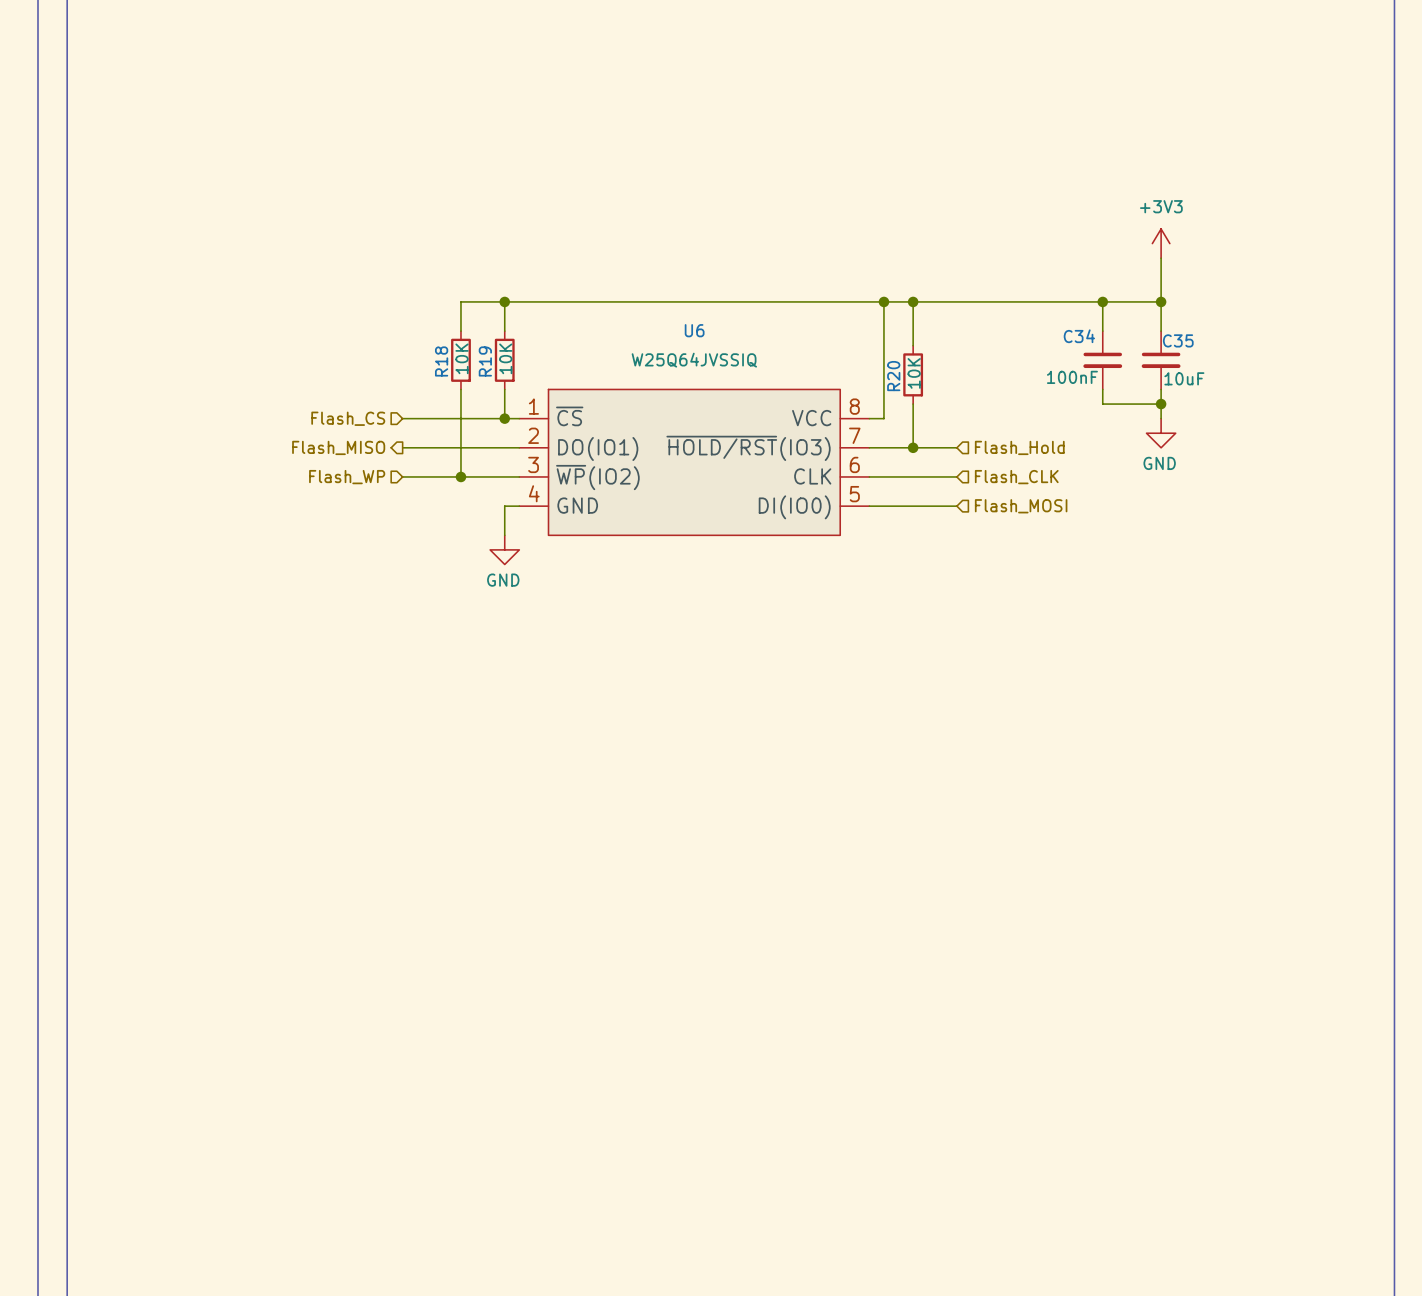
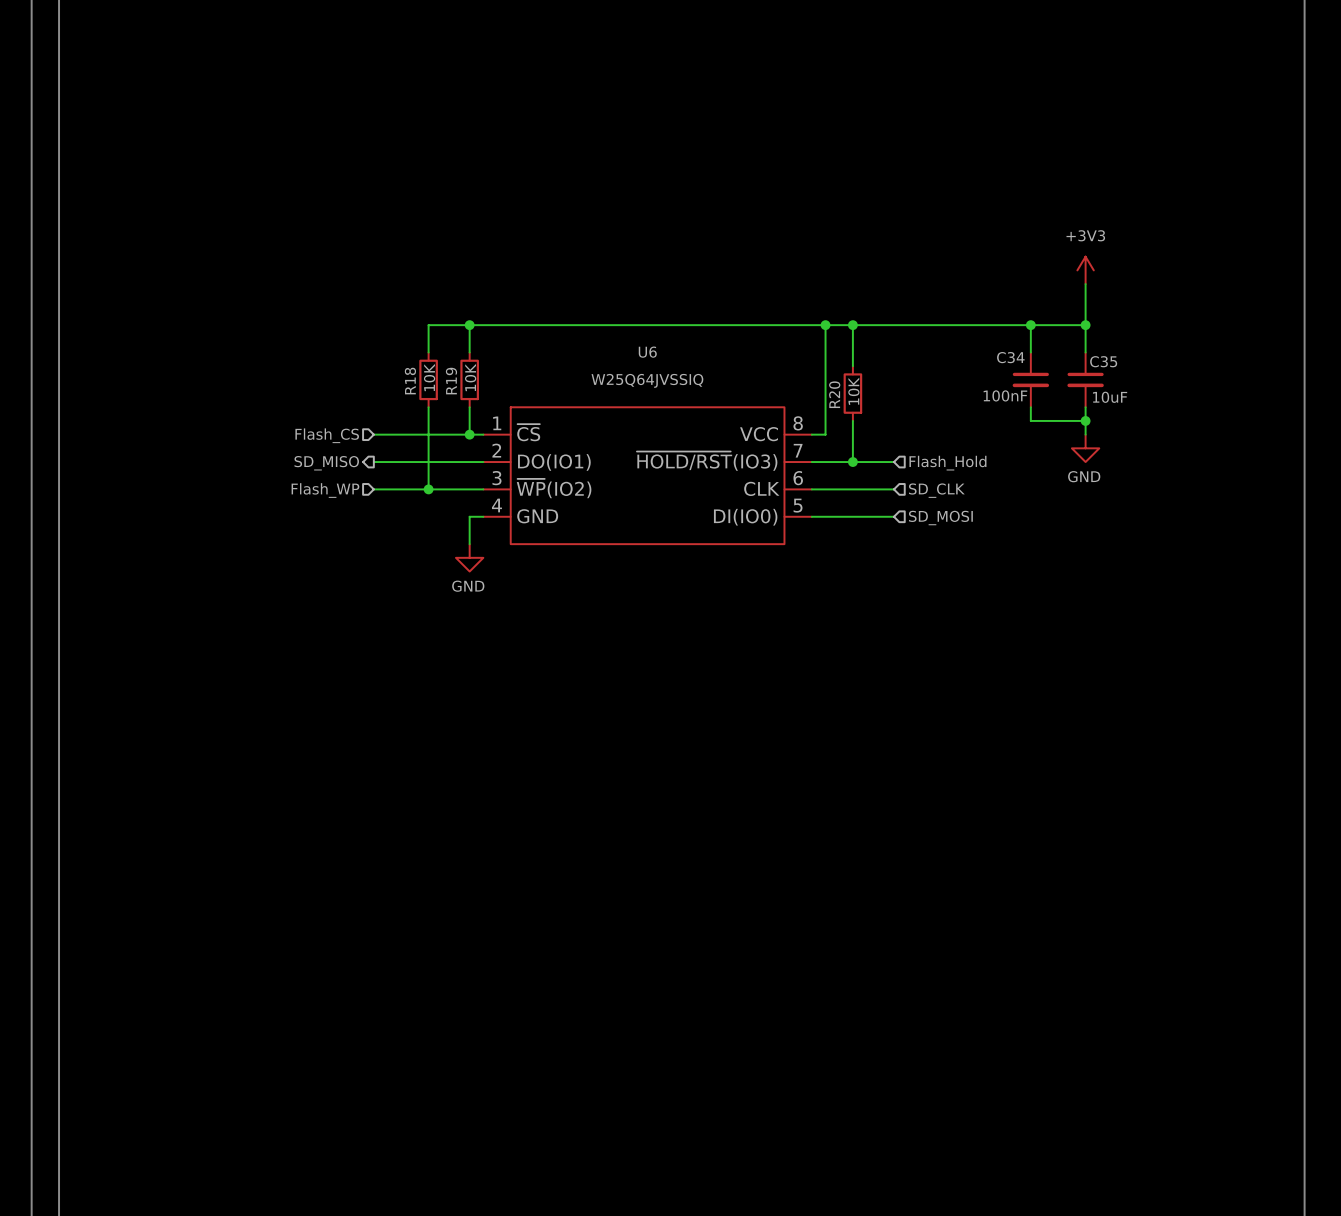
hierarchical label: Flash_MISO (338, 447) -> SD_MISO (326, 463)
hierarchical label: Flash_CLK (1016, 477) -> SD_CLK (936, 490)
hierarchical label: Flash_MOSI (1021, 506) -> SD_MOSI (940, 518)

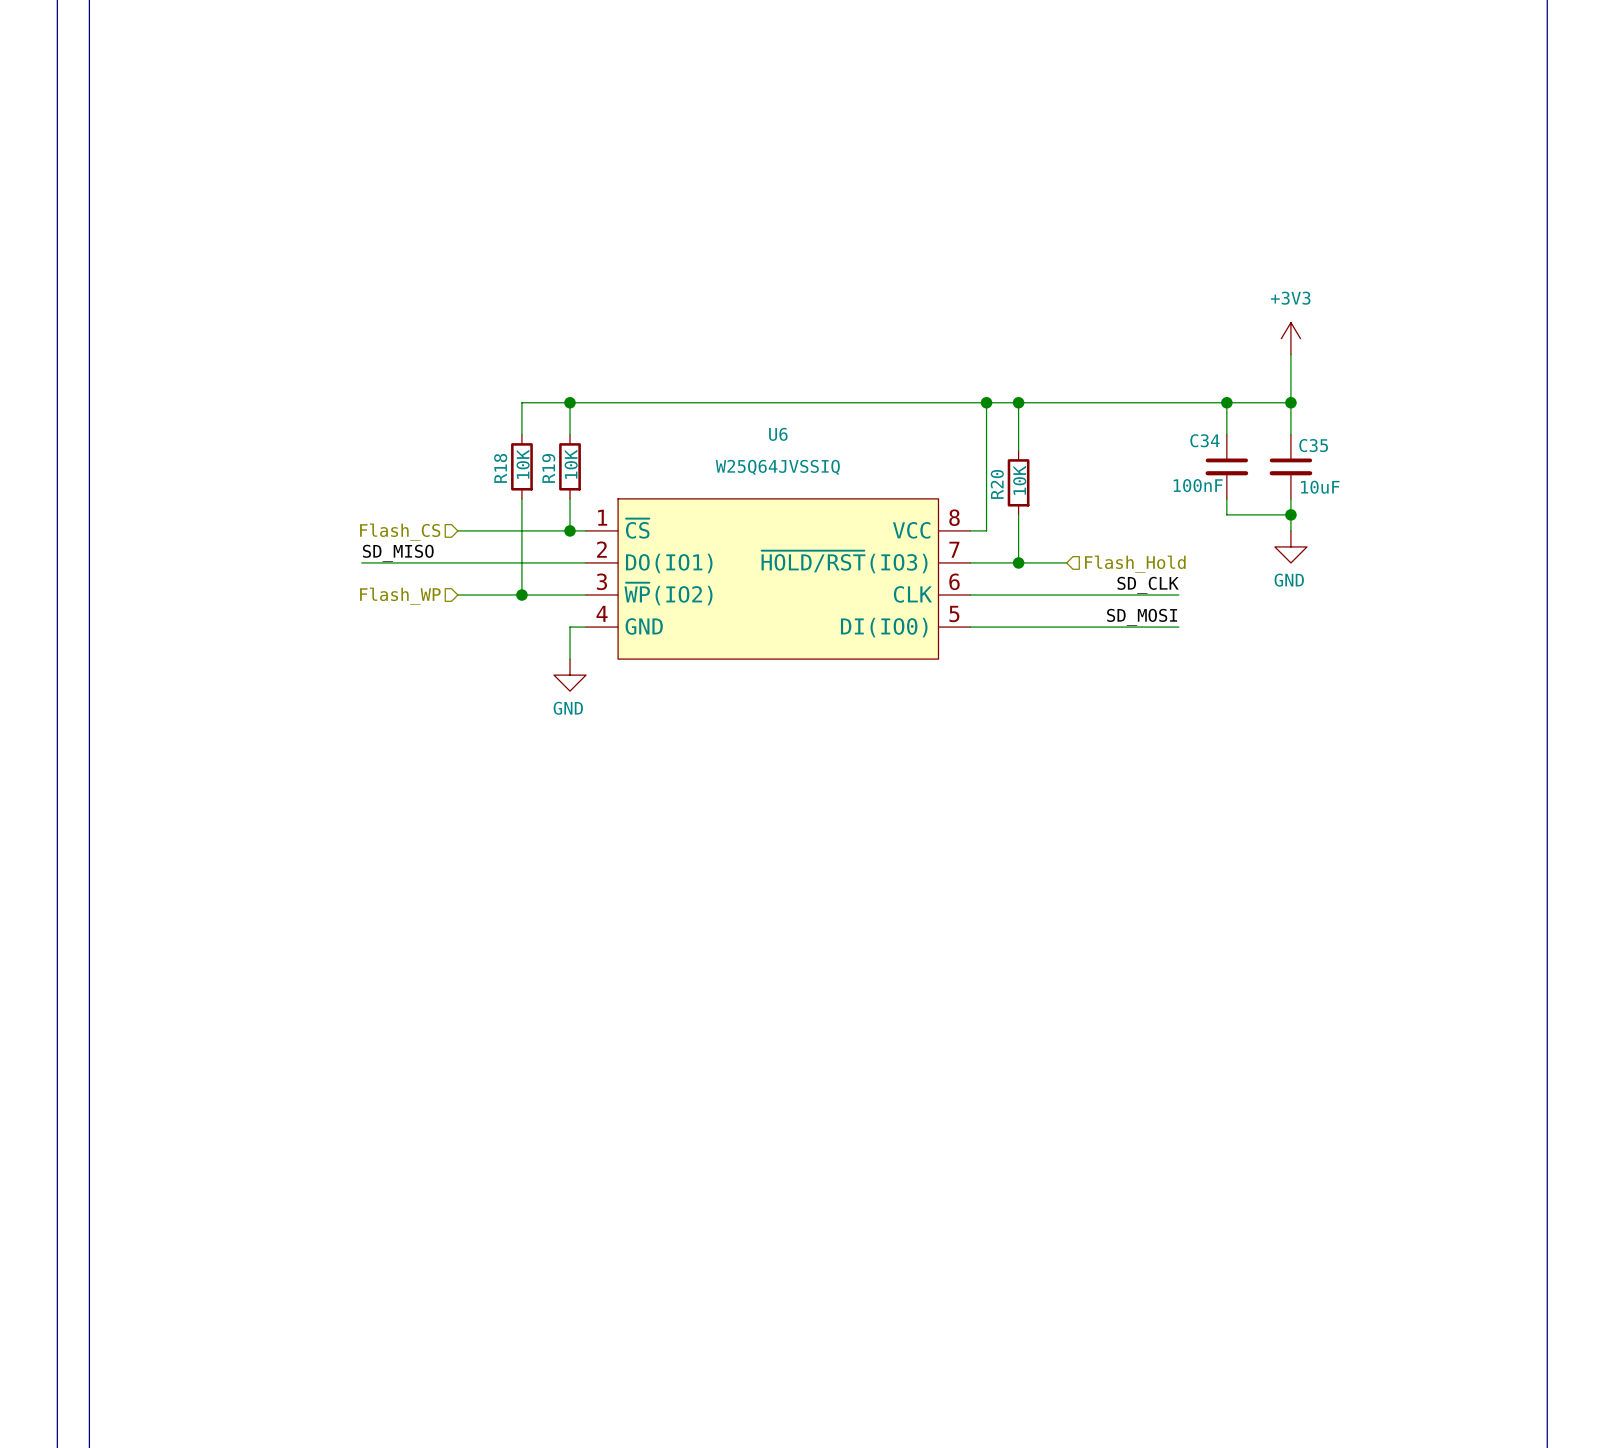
label: none -> SD_MISO (398, 553)
wire: none -> (361, 562) (457, 562)
hierarchical label: SD_MISO (326, 463) -> none
label: none -> SD_CLK (1148, 585)
wire: none -> (1066, 595) (1178, 595)
hierarchical label: SD_CLK (936, 490) -> none
label: none -> SD_MOSI (1142, 617)
wire: none -> (1066, 627) (1178, 627)
hierarchical label: SD_MOSI (940, 518) -> none

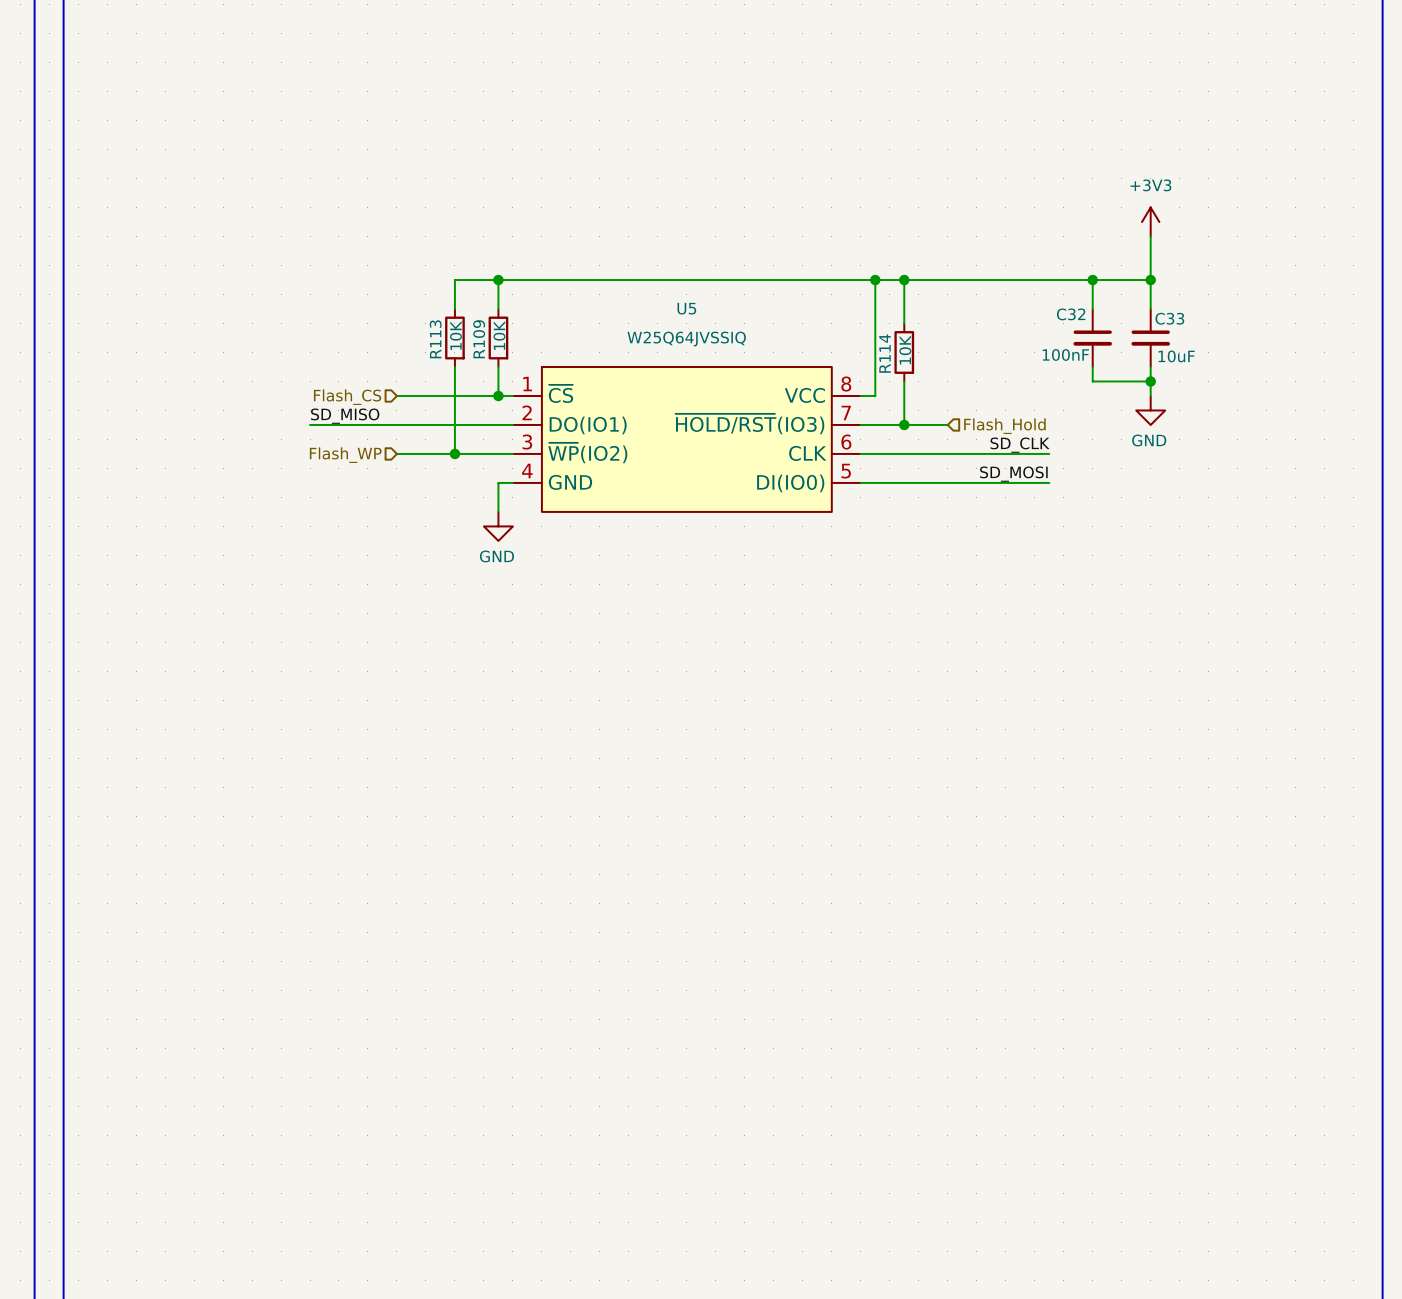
U6 name: U6 (778, 434) -> U5 (686, 308)
C34 name: C34 (1204, 440) -> C32 (1071, 314)
C35 name: C35 (1313, 445) -> C33 (1169, 318)
R18 name: R18 (500, 468) -> R113 (435, 339)
R19 name: R19 (548, 468) -> R109 (479, 339)
R20 name: R20 (997, 484) -> R114 (885, 353)

